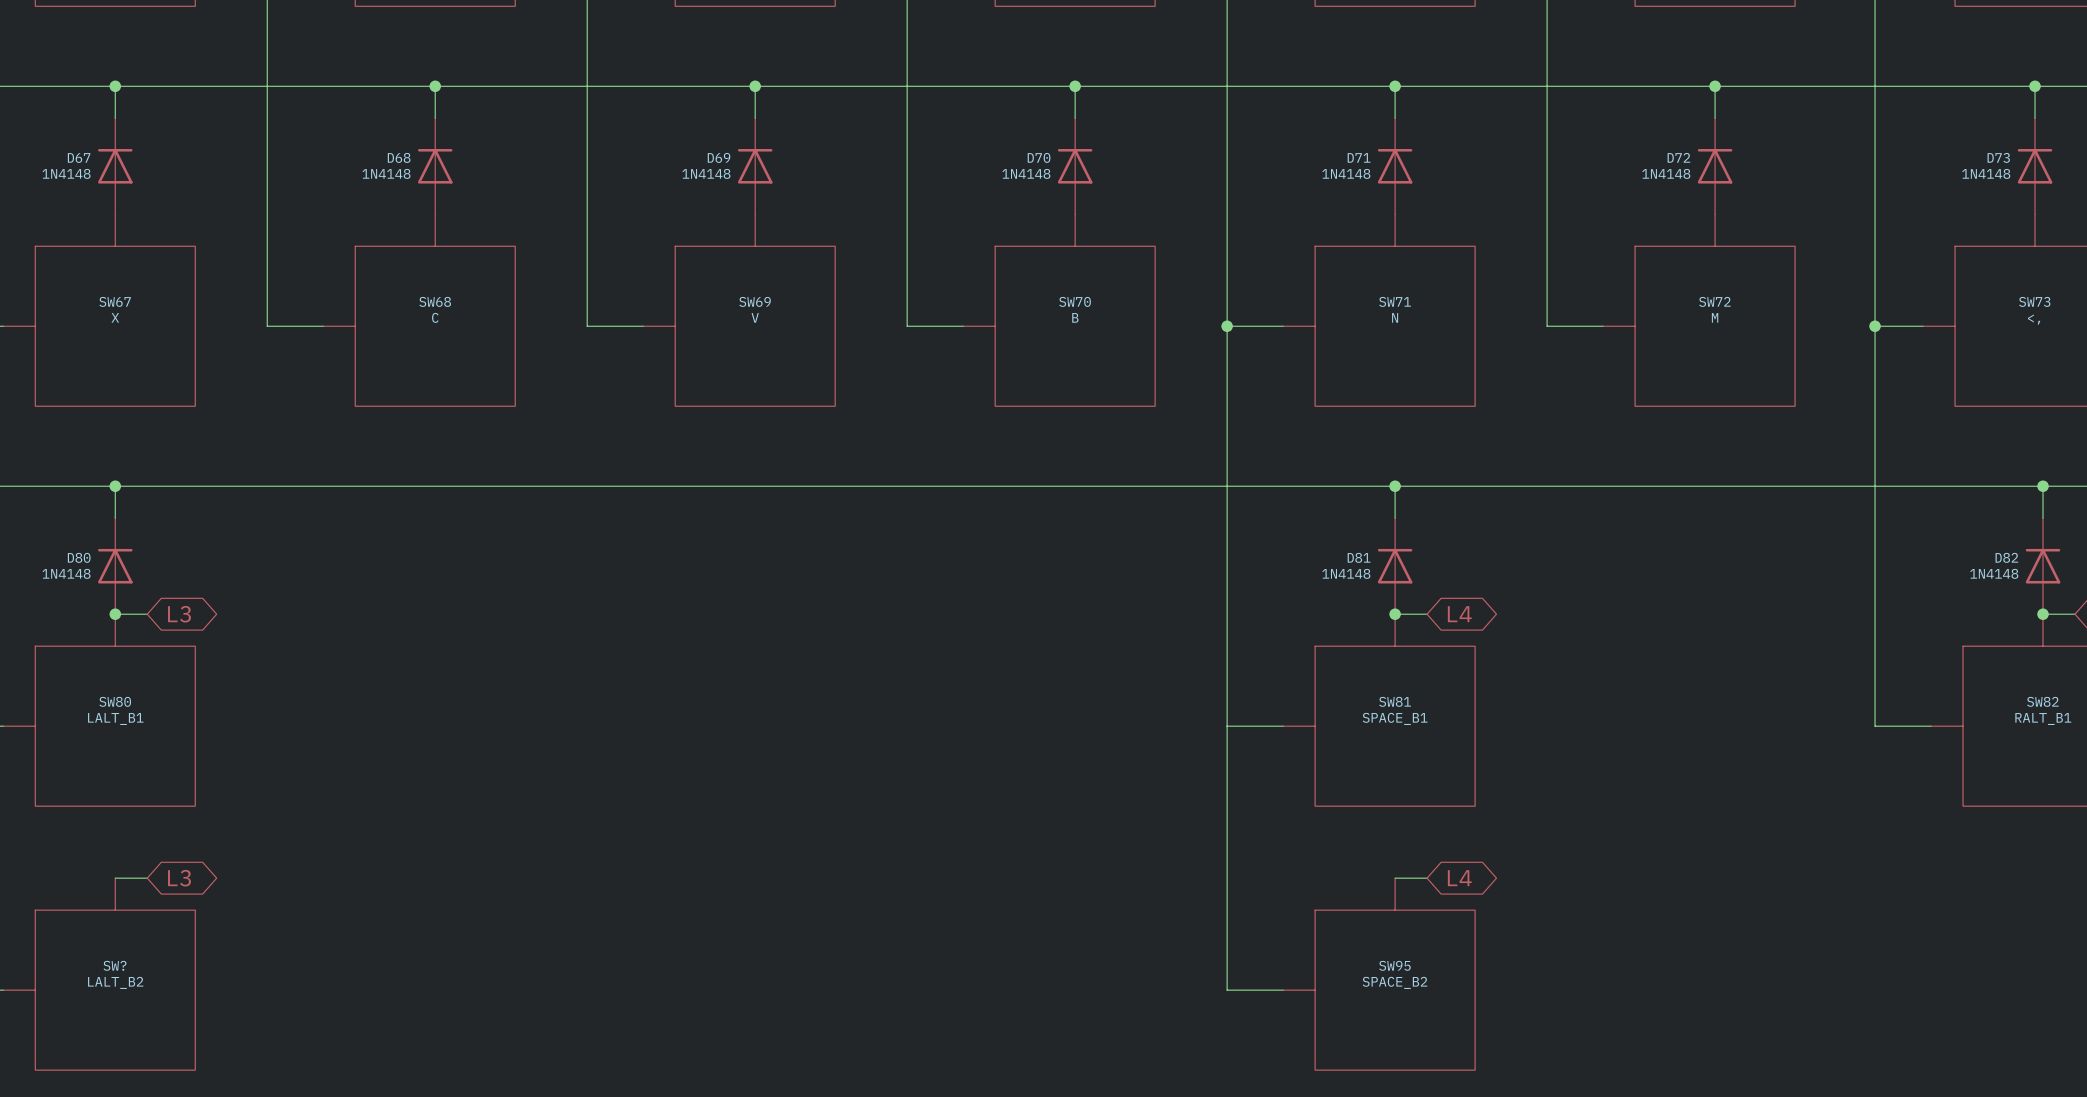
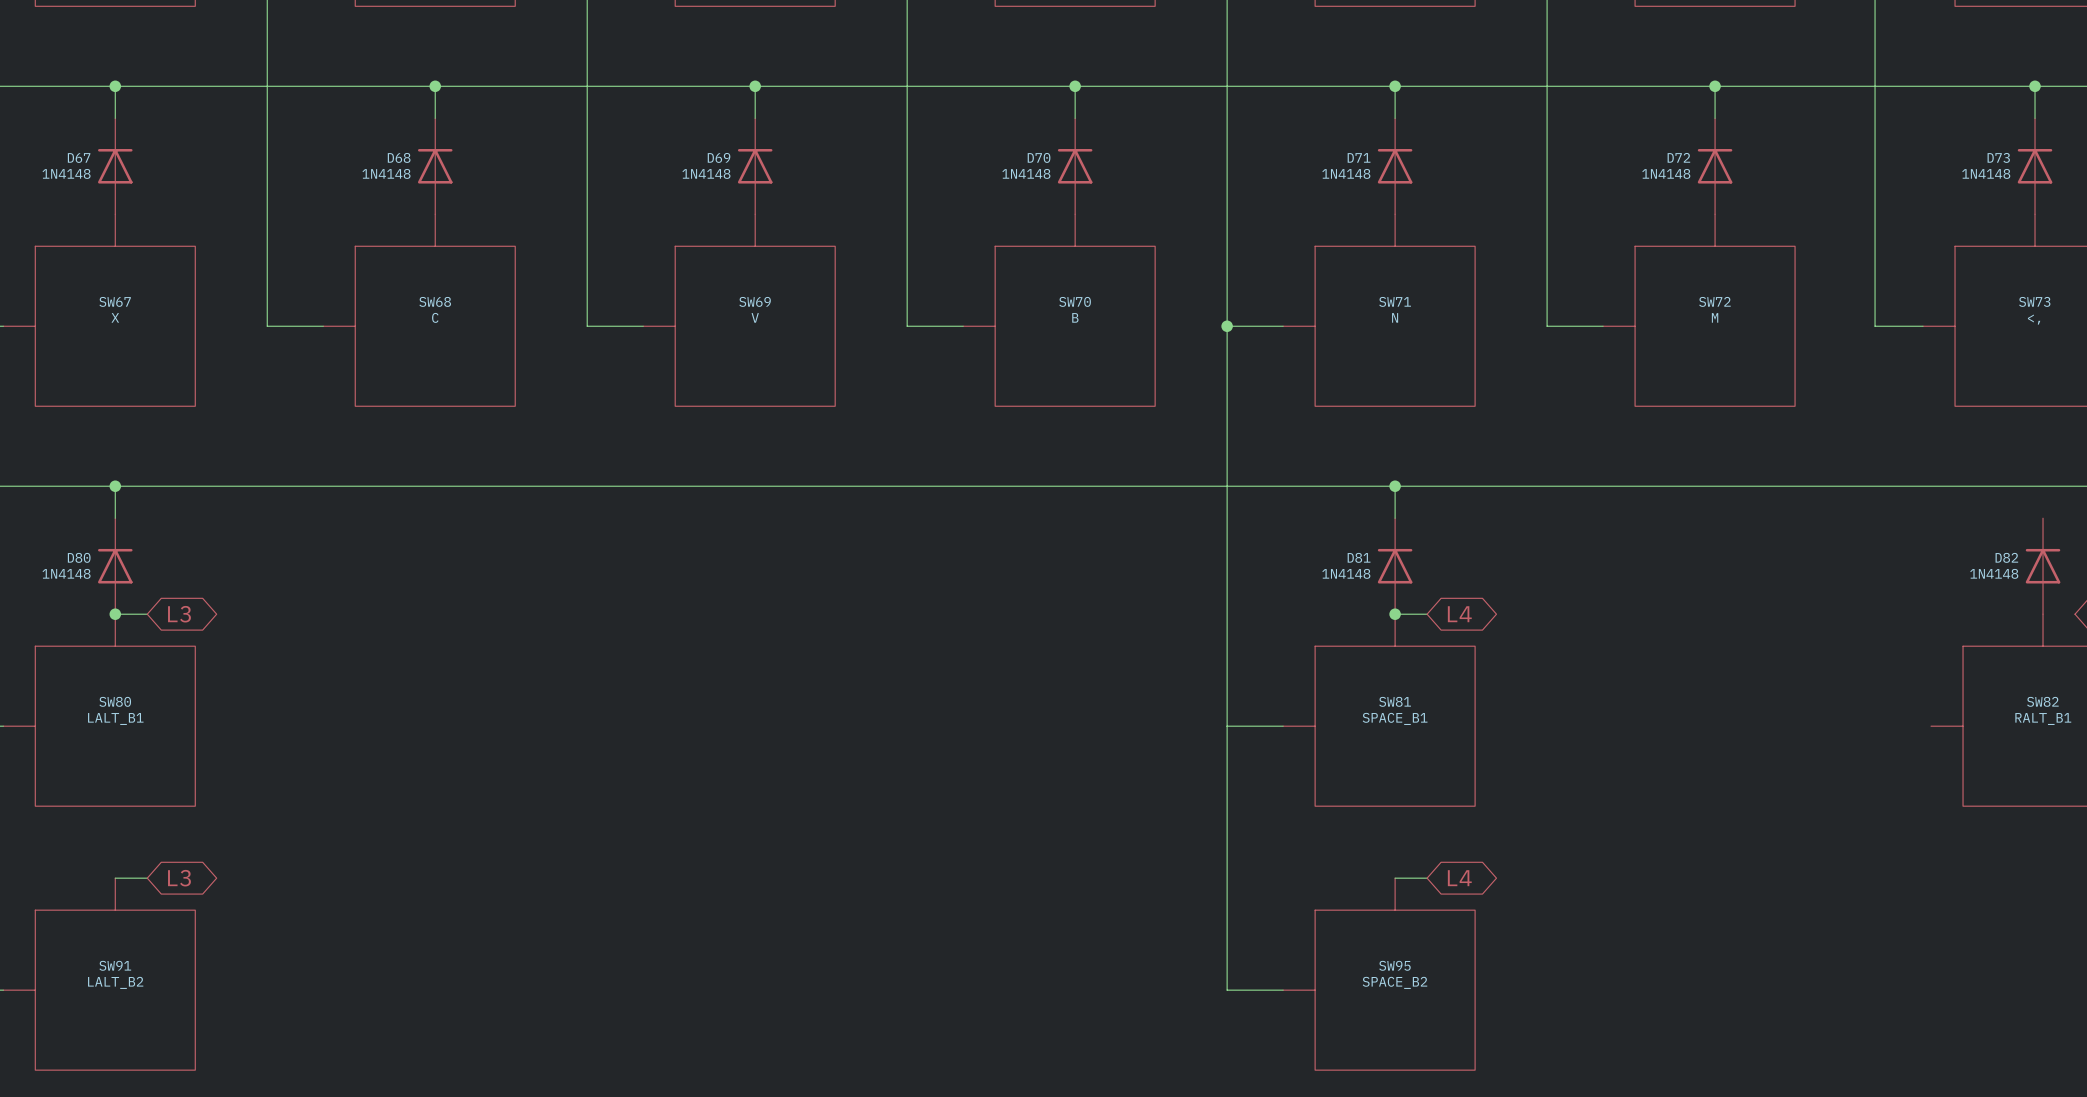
wire: (1875, 326) (1875, 726) (1931, 726) -> none
junction: (1875, 326) -> none
wire: (2043, 486) (2043, 518) -> none
junction: (2043, 486) -> none
wire: (2043, 614) (2075, 614) -> none
junction: (2043, 614) -> none
SW? name: SW? (114, 965) -> SW91 (115, 965)

